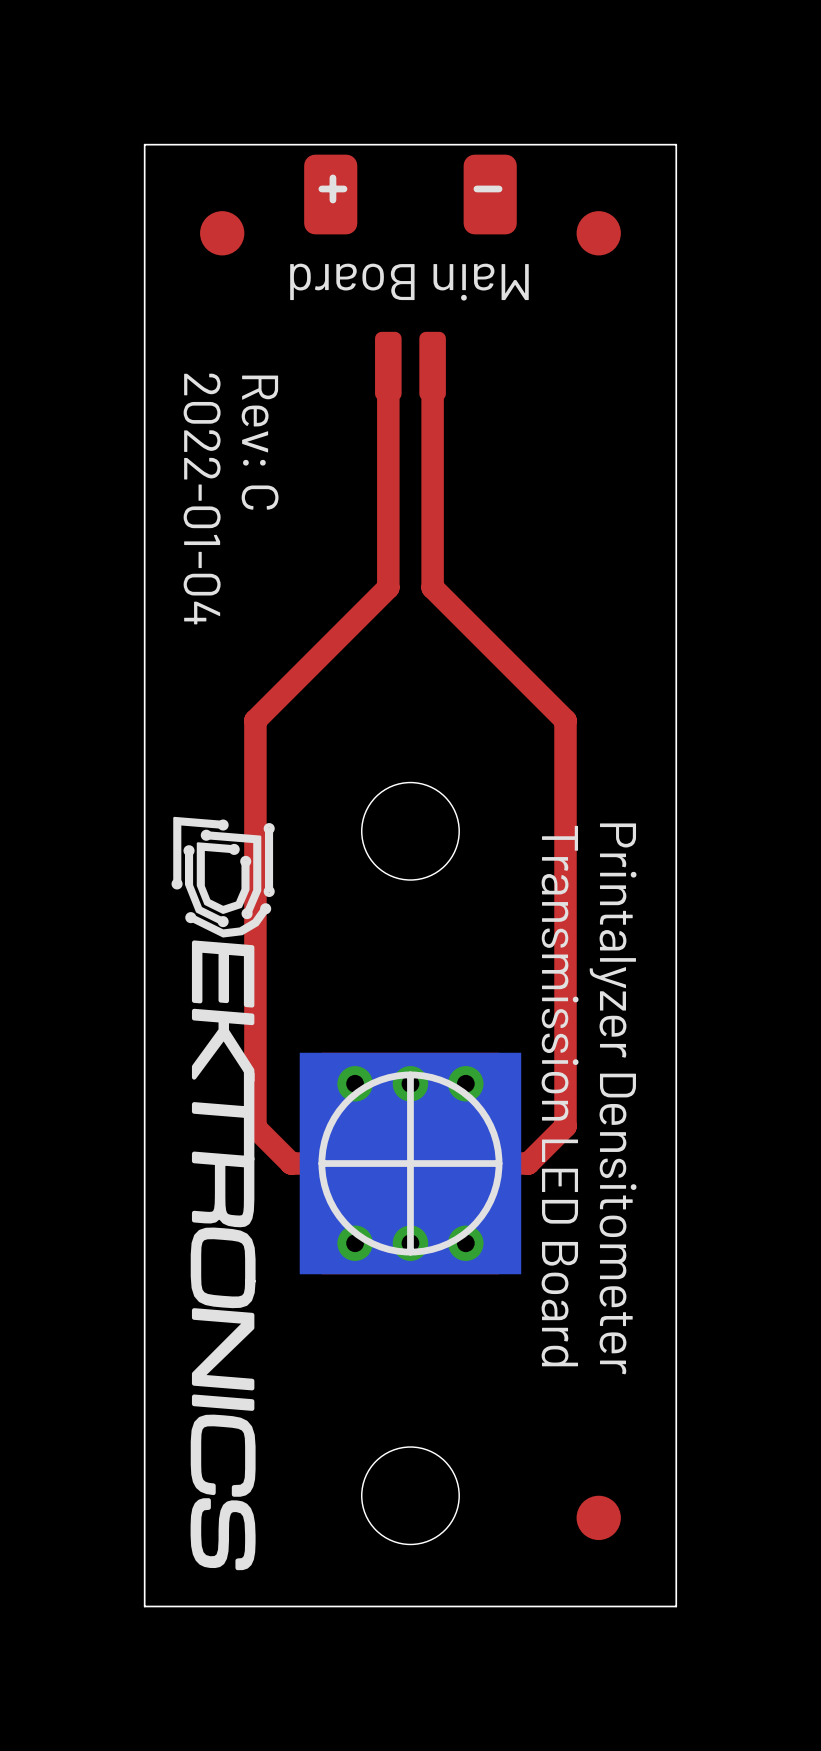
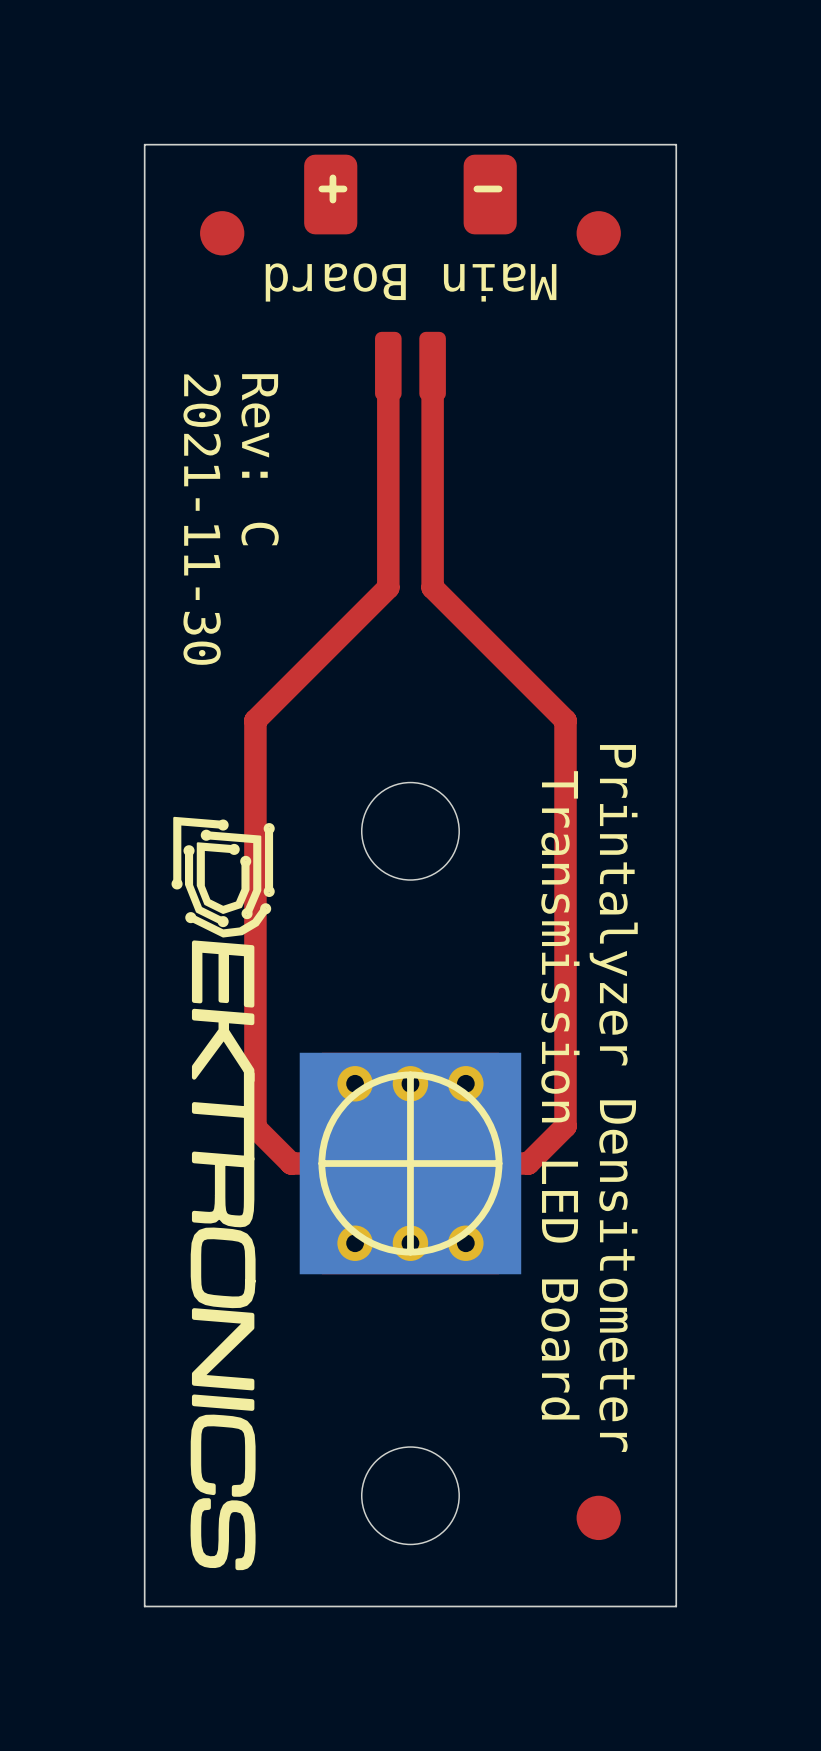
text: 2022-01-04 (202, 499) -> 2021-11-30 (202, 519)

